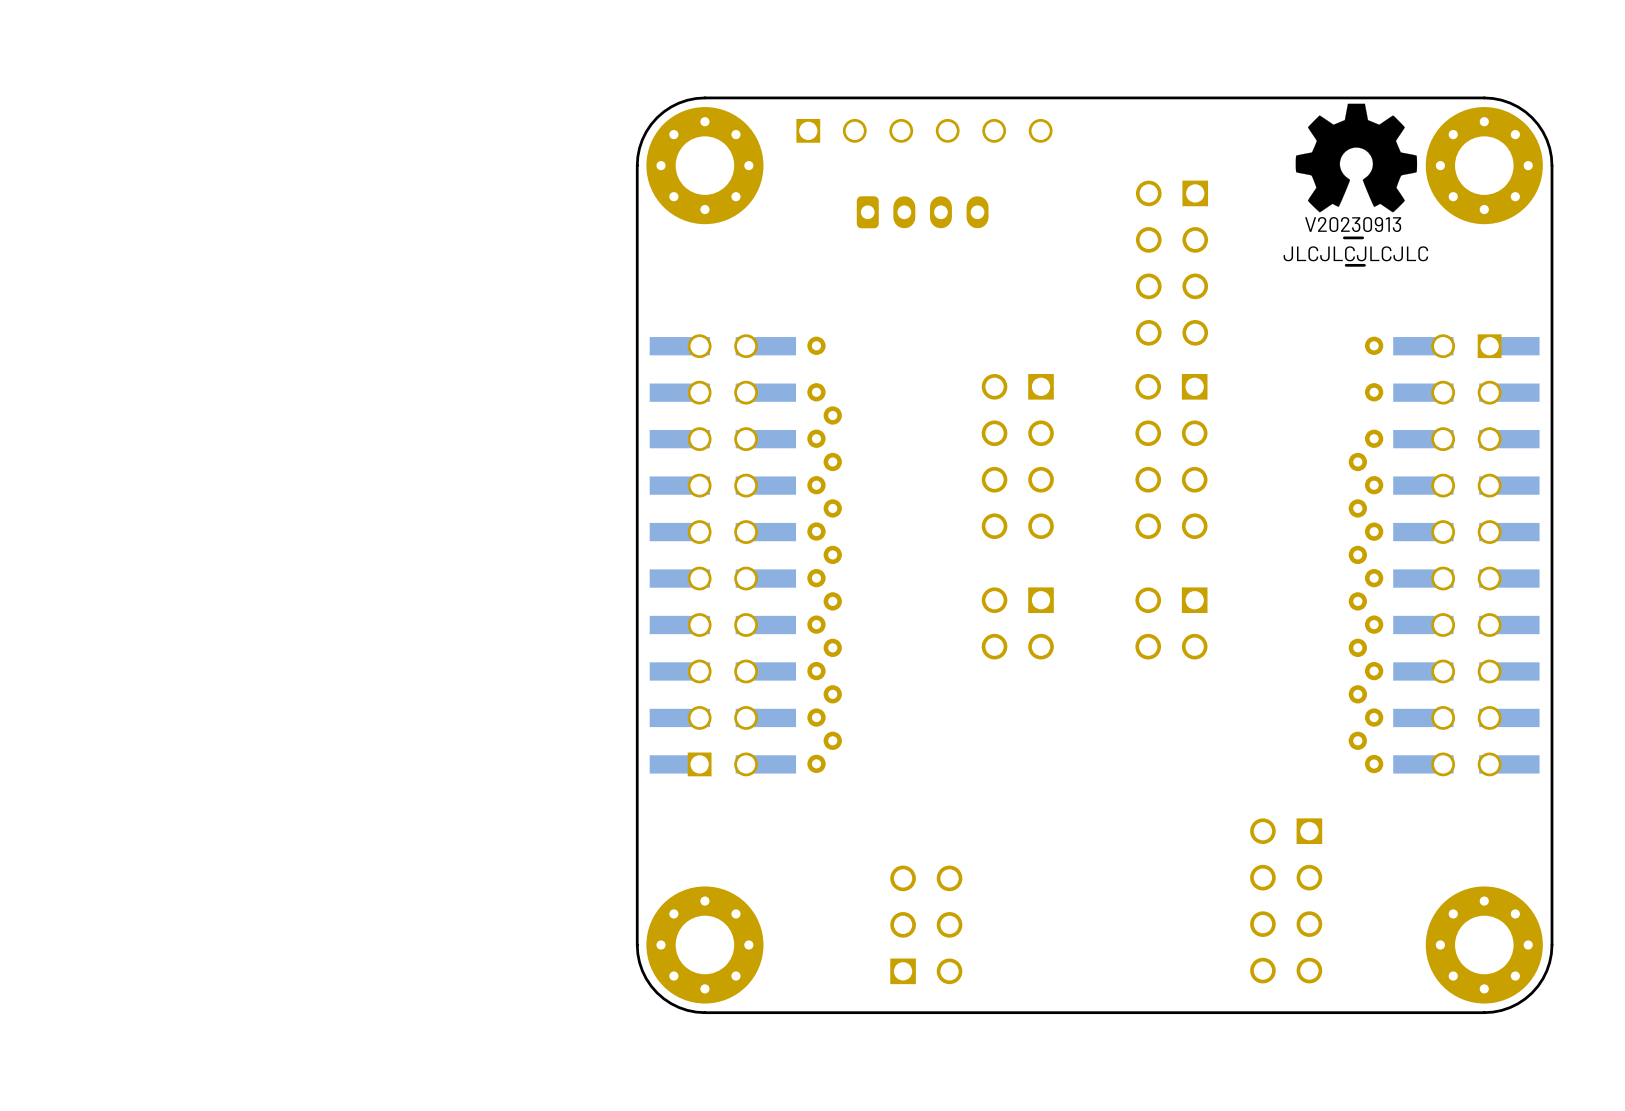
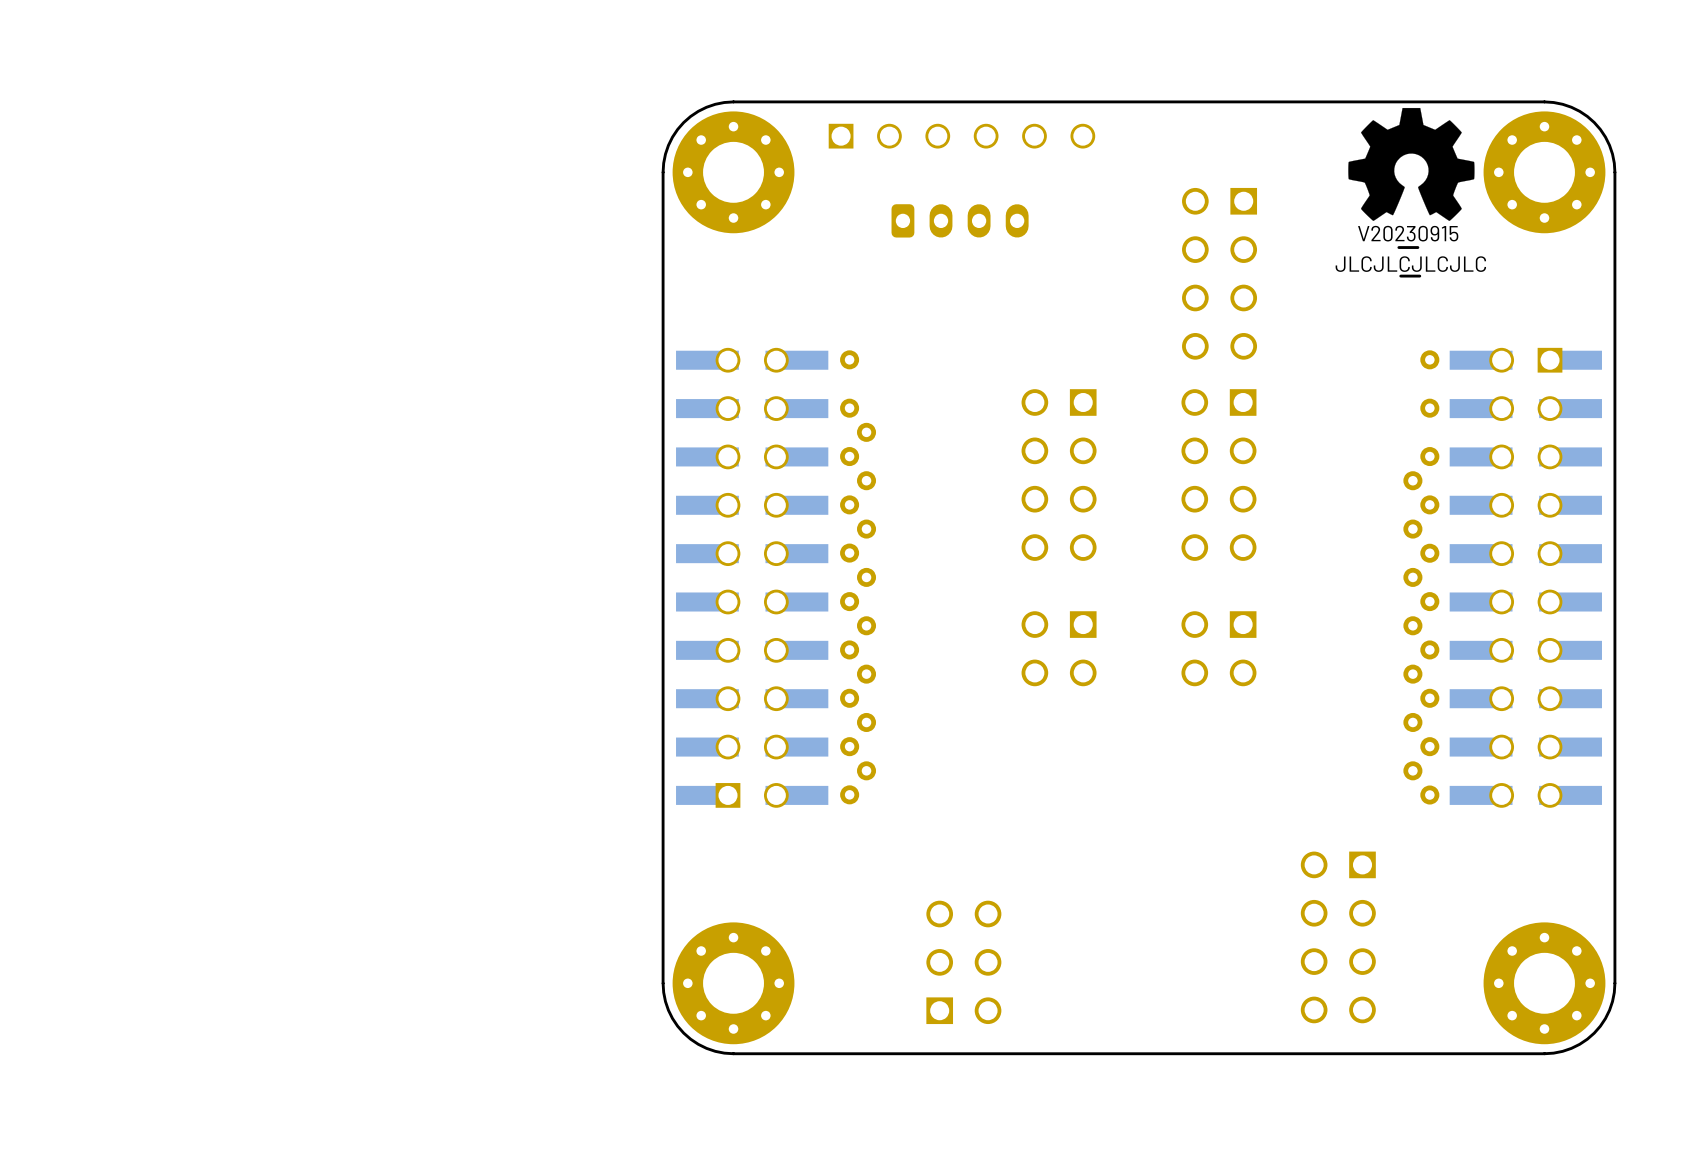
drawing shape: [1305, 217, 1402, 240] -> [1358, 225, 1459, 249]

